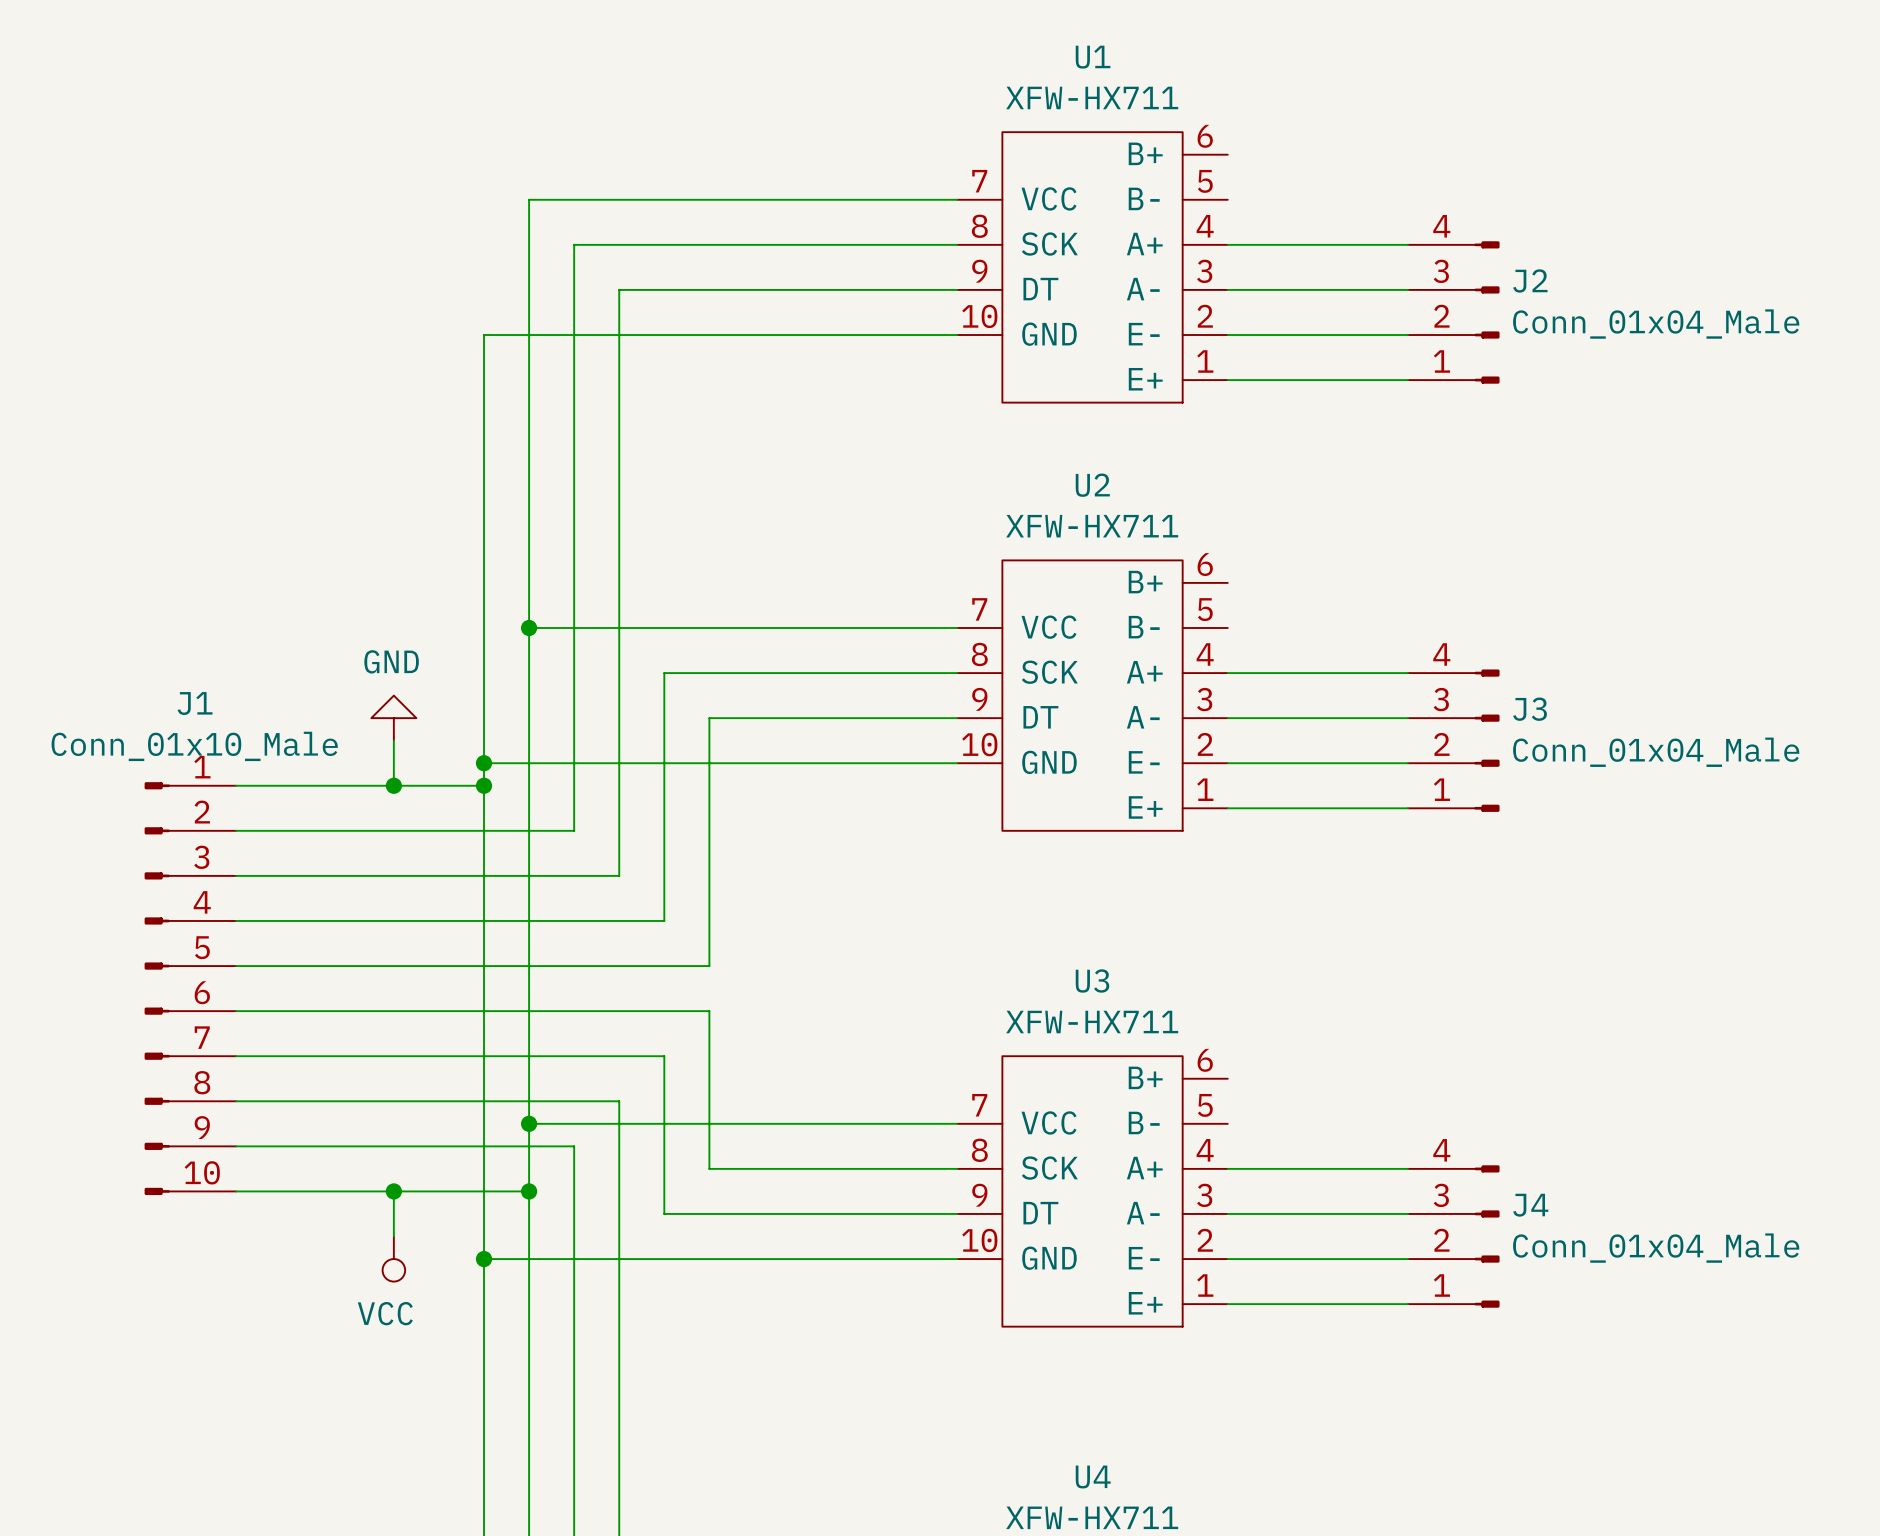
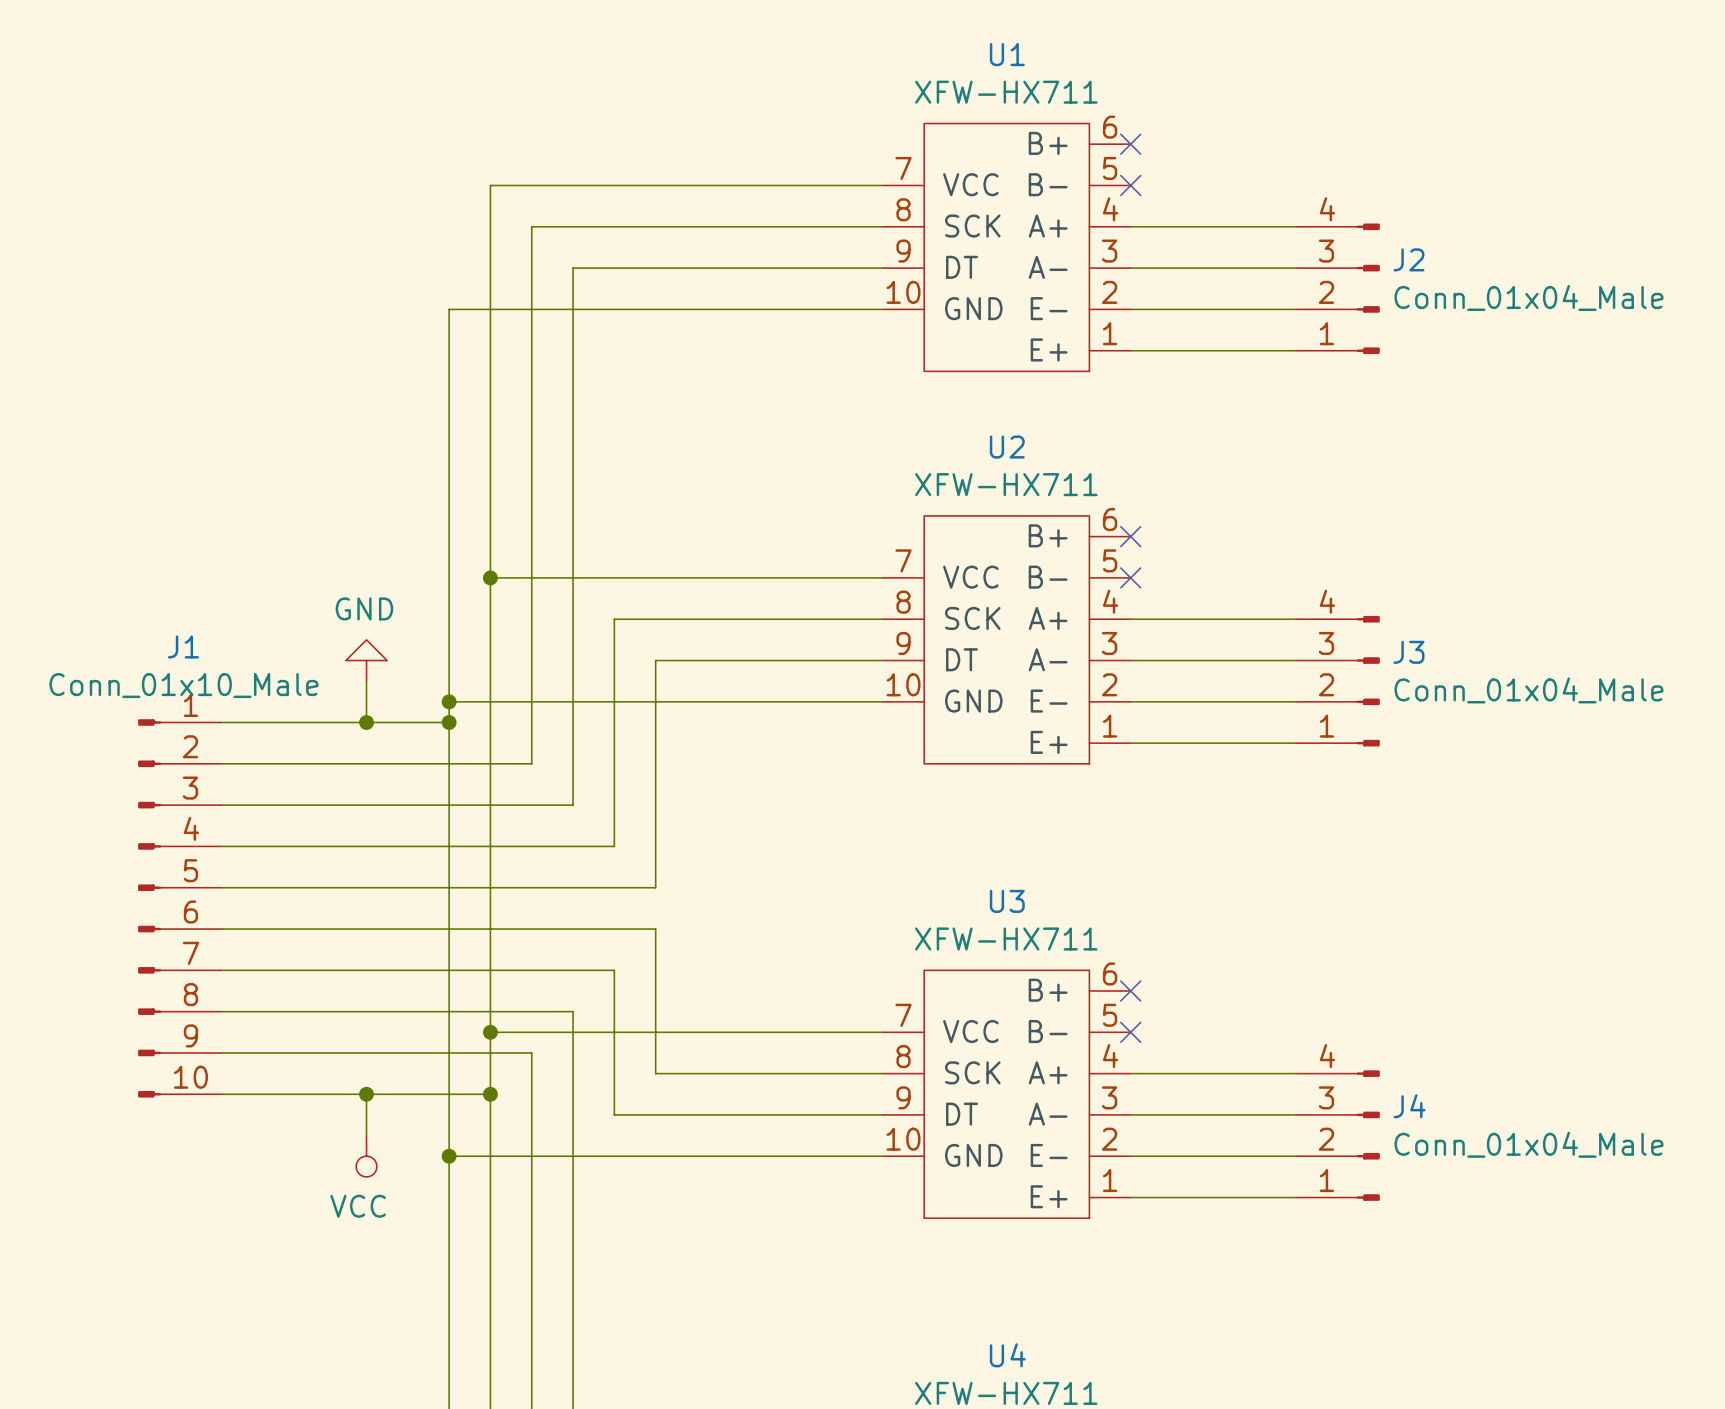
no-connect mark: none -> (1130, 144)
no-connect mark: none -> (1130, 185)
no-connect mark: none -> (1130, 536)
no-connect mark: none -> (1130, 577)
no-connect mark: none -> (1130, 991)
no-connect mark: none -> (1130, 1032)

